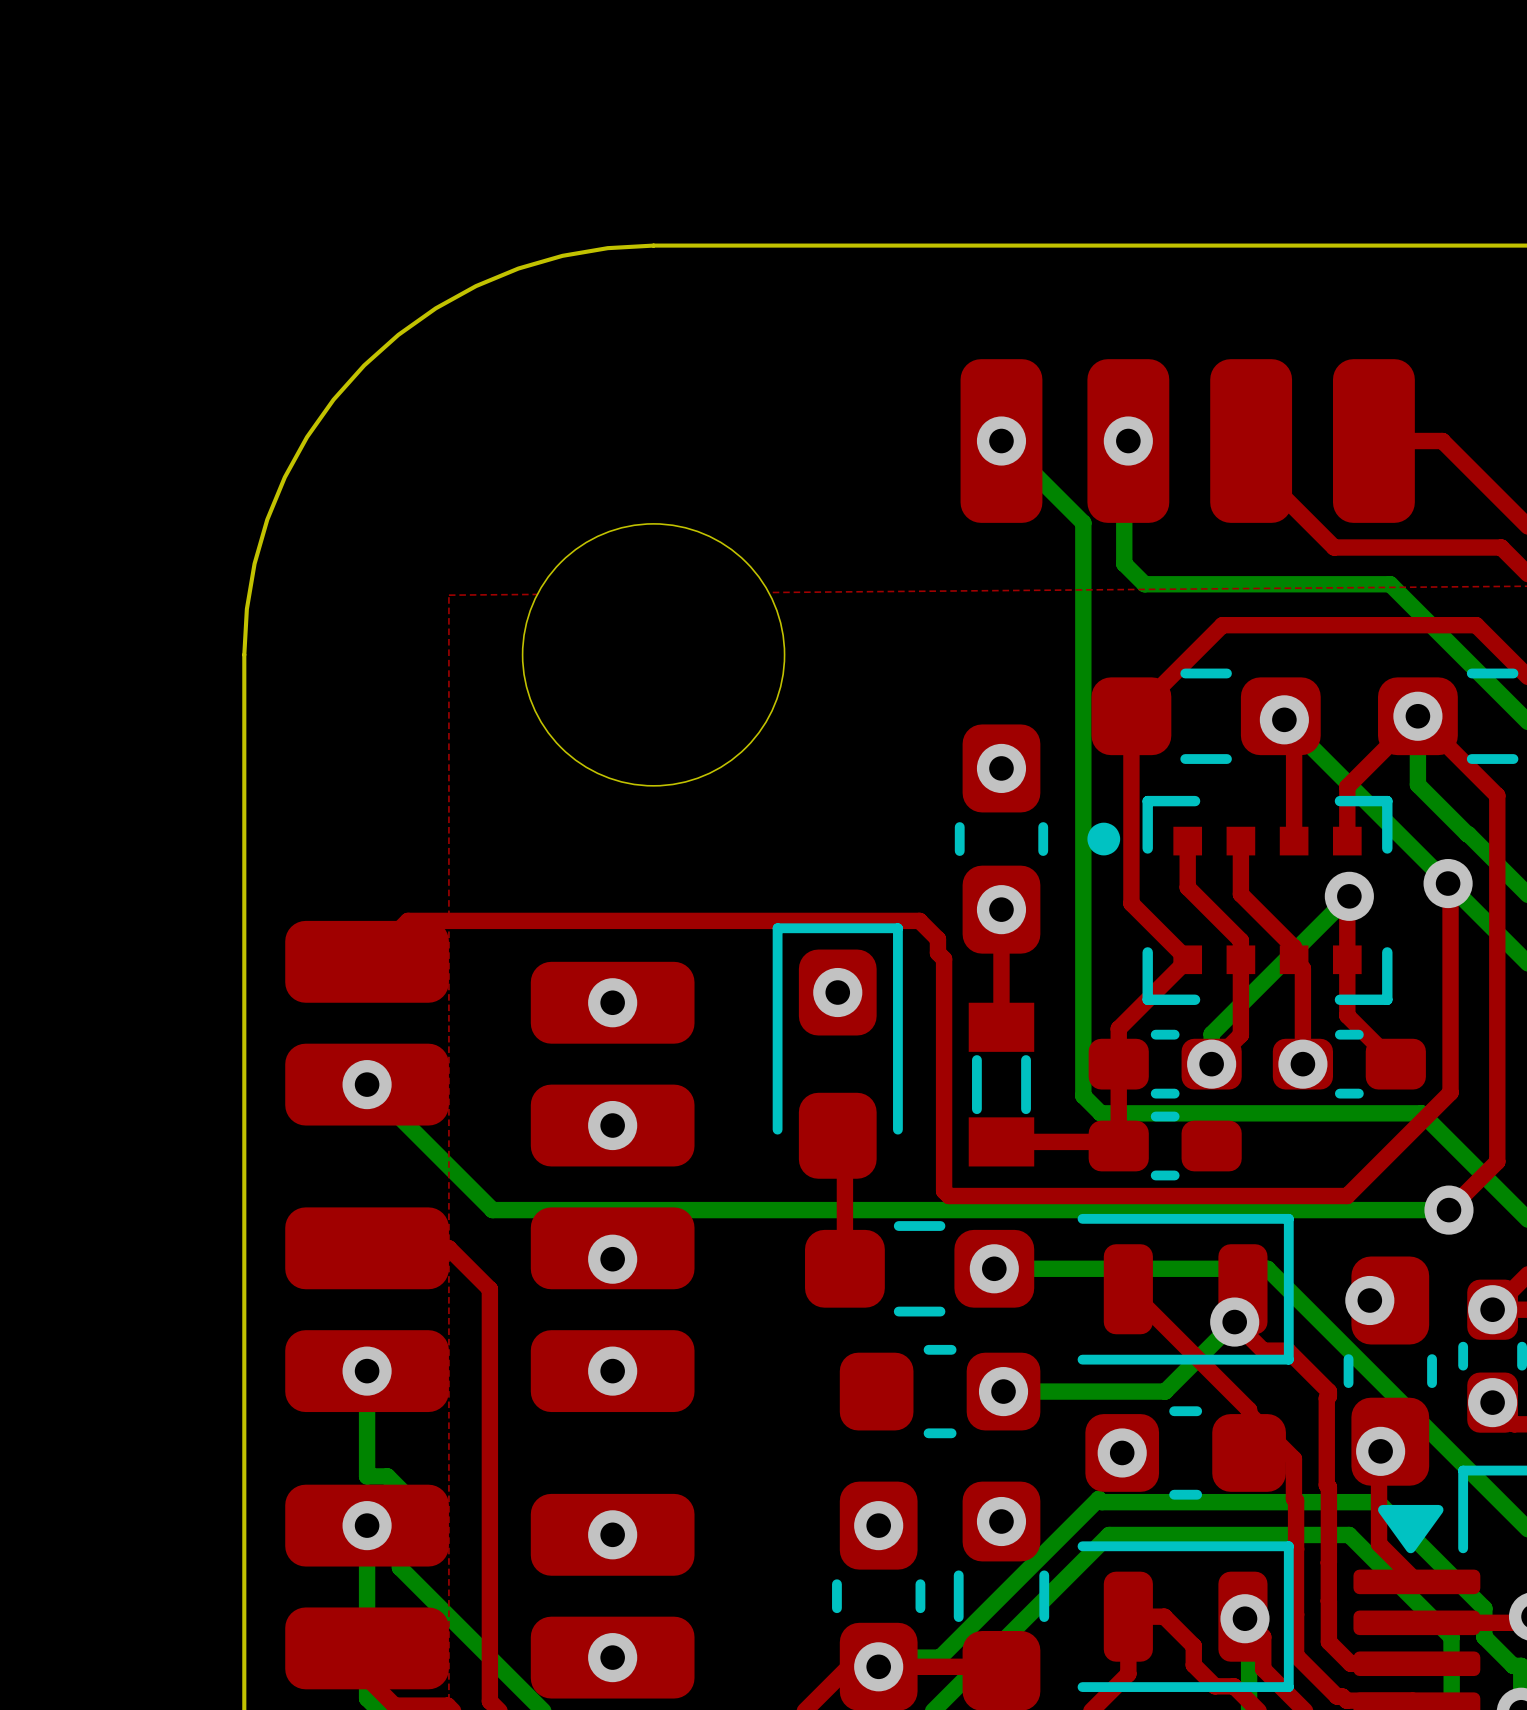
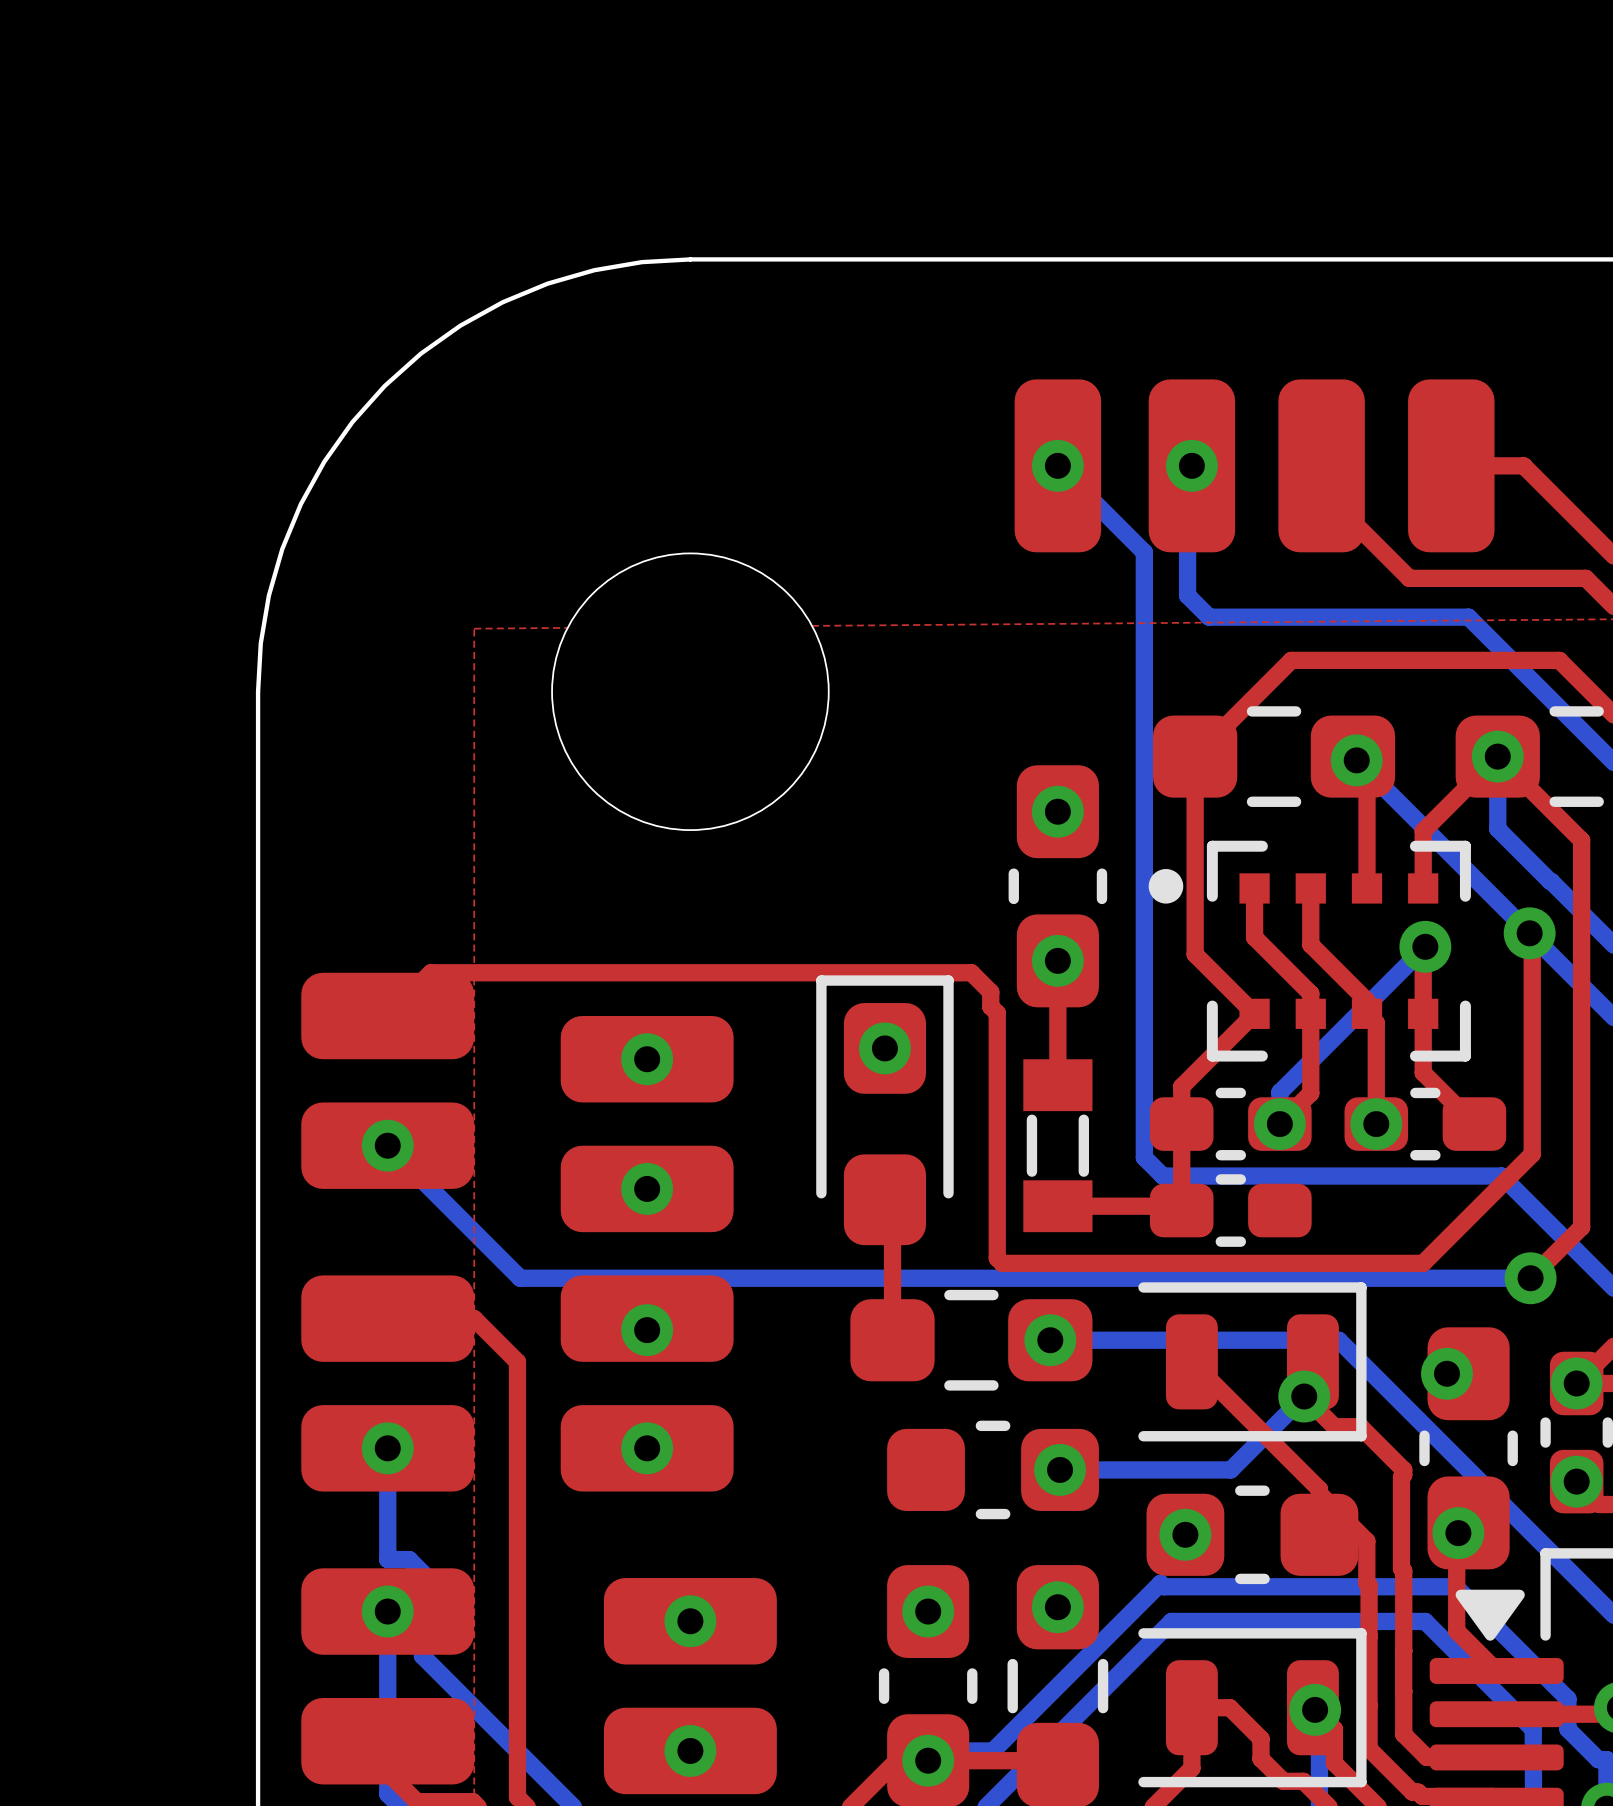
part position: (612, 1534) -> (690, 1621)
via position: (612, 1534) -> (690, 1621)
part position: (612, 1657) -> (690, 1750)
via position: (612, 1657) -> (690, 1750)

